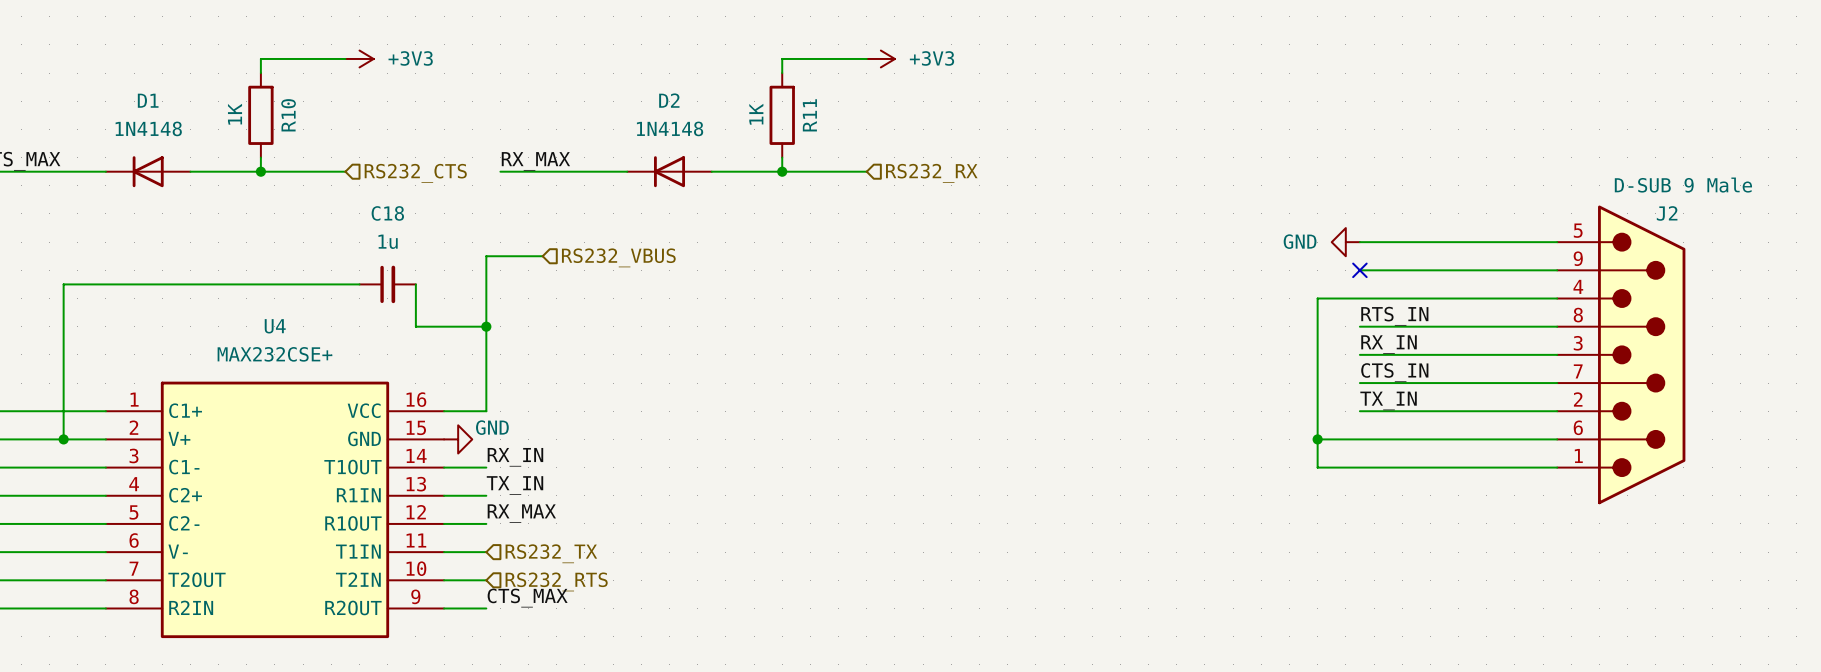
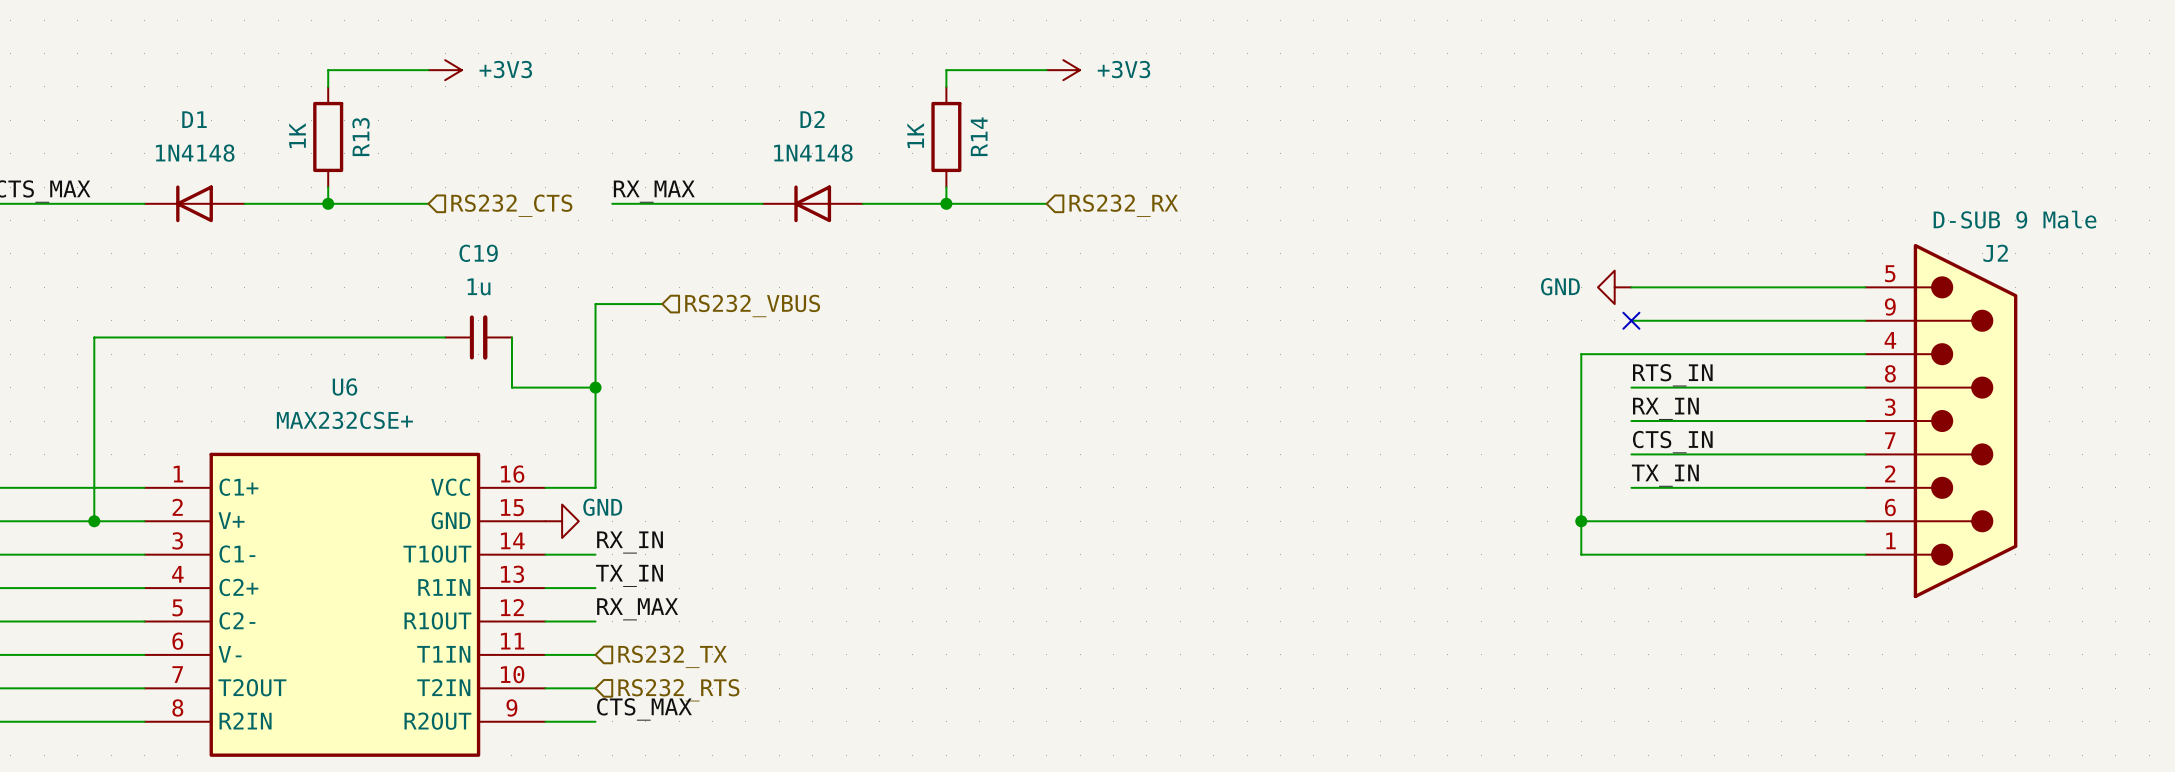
R10 name: R10 (288, 115) -> R13 (361, 137)
R11 name: R11 (809, 115) -> R14 (979, 136)
C18 name: C18 (387, 213) -> C19 (478, 253)
U4 name: U4 (275, 326) -> U6 (344, 386)

